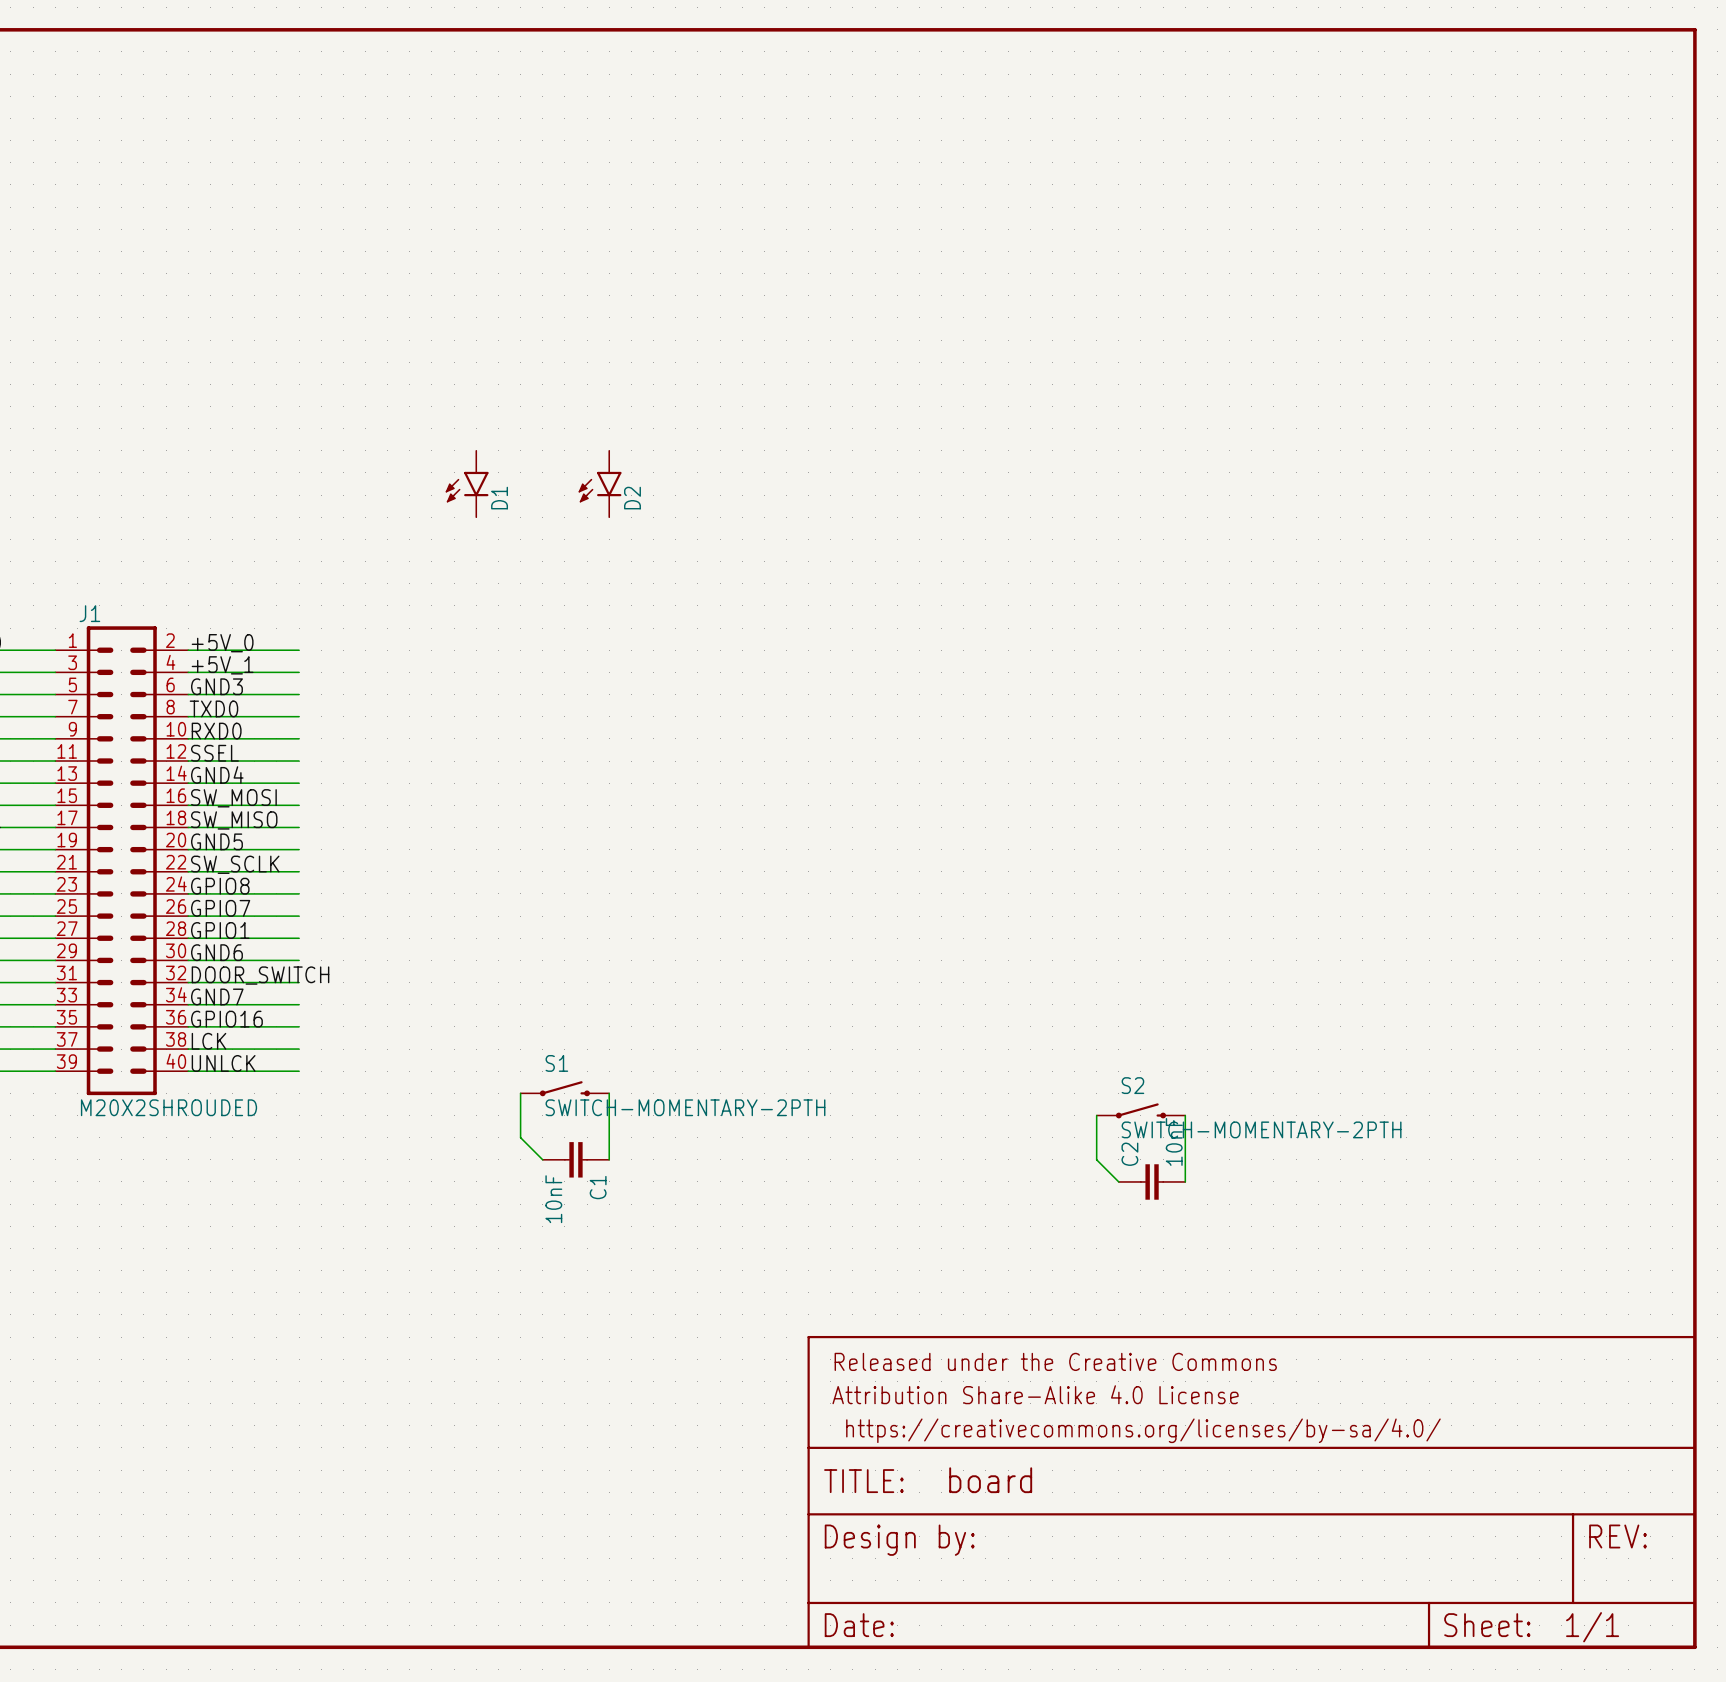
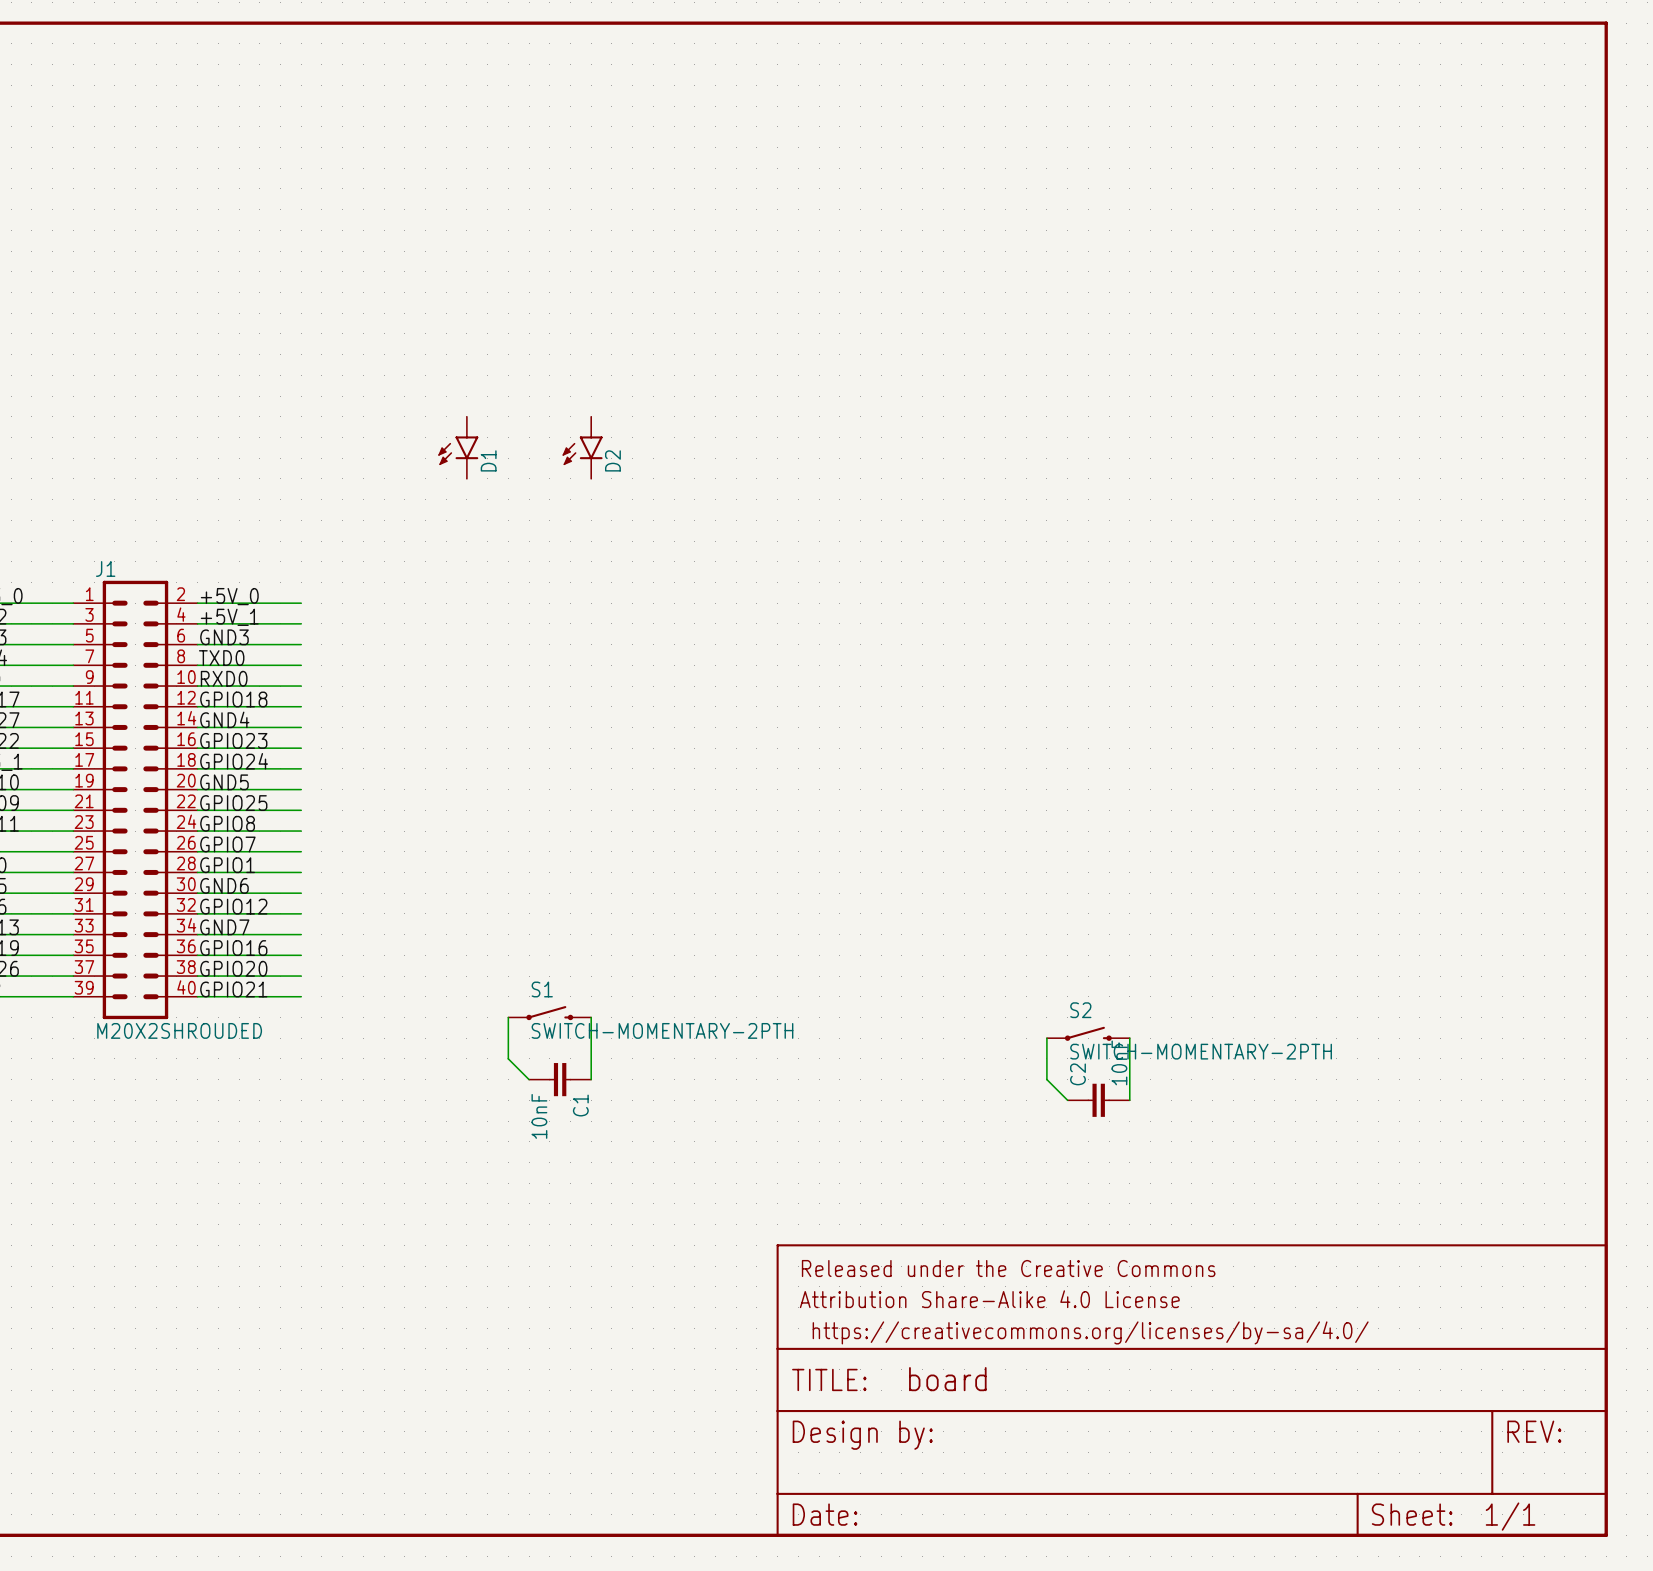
label: SSEL (214, 753) -> GPIO18 (233, 699)
label: SW_MOSI (233, 798) -> GPIO23 (233, 740)
label: SW_MISO (234, 820) -> GPIO24 (234, 761)
label: SW_SCLK (235, 864) -> GPIO25 (233, 803)
label: DOOR_SWITCH (260, 975) -> GPIO12 (233, 906)
label: LCK (208, 1041) -> GPIO20 (233, 968)
label: UNLCK (223, 1063) -> GPIO21 (233, 989)

